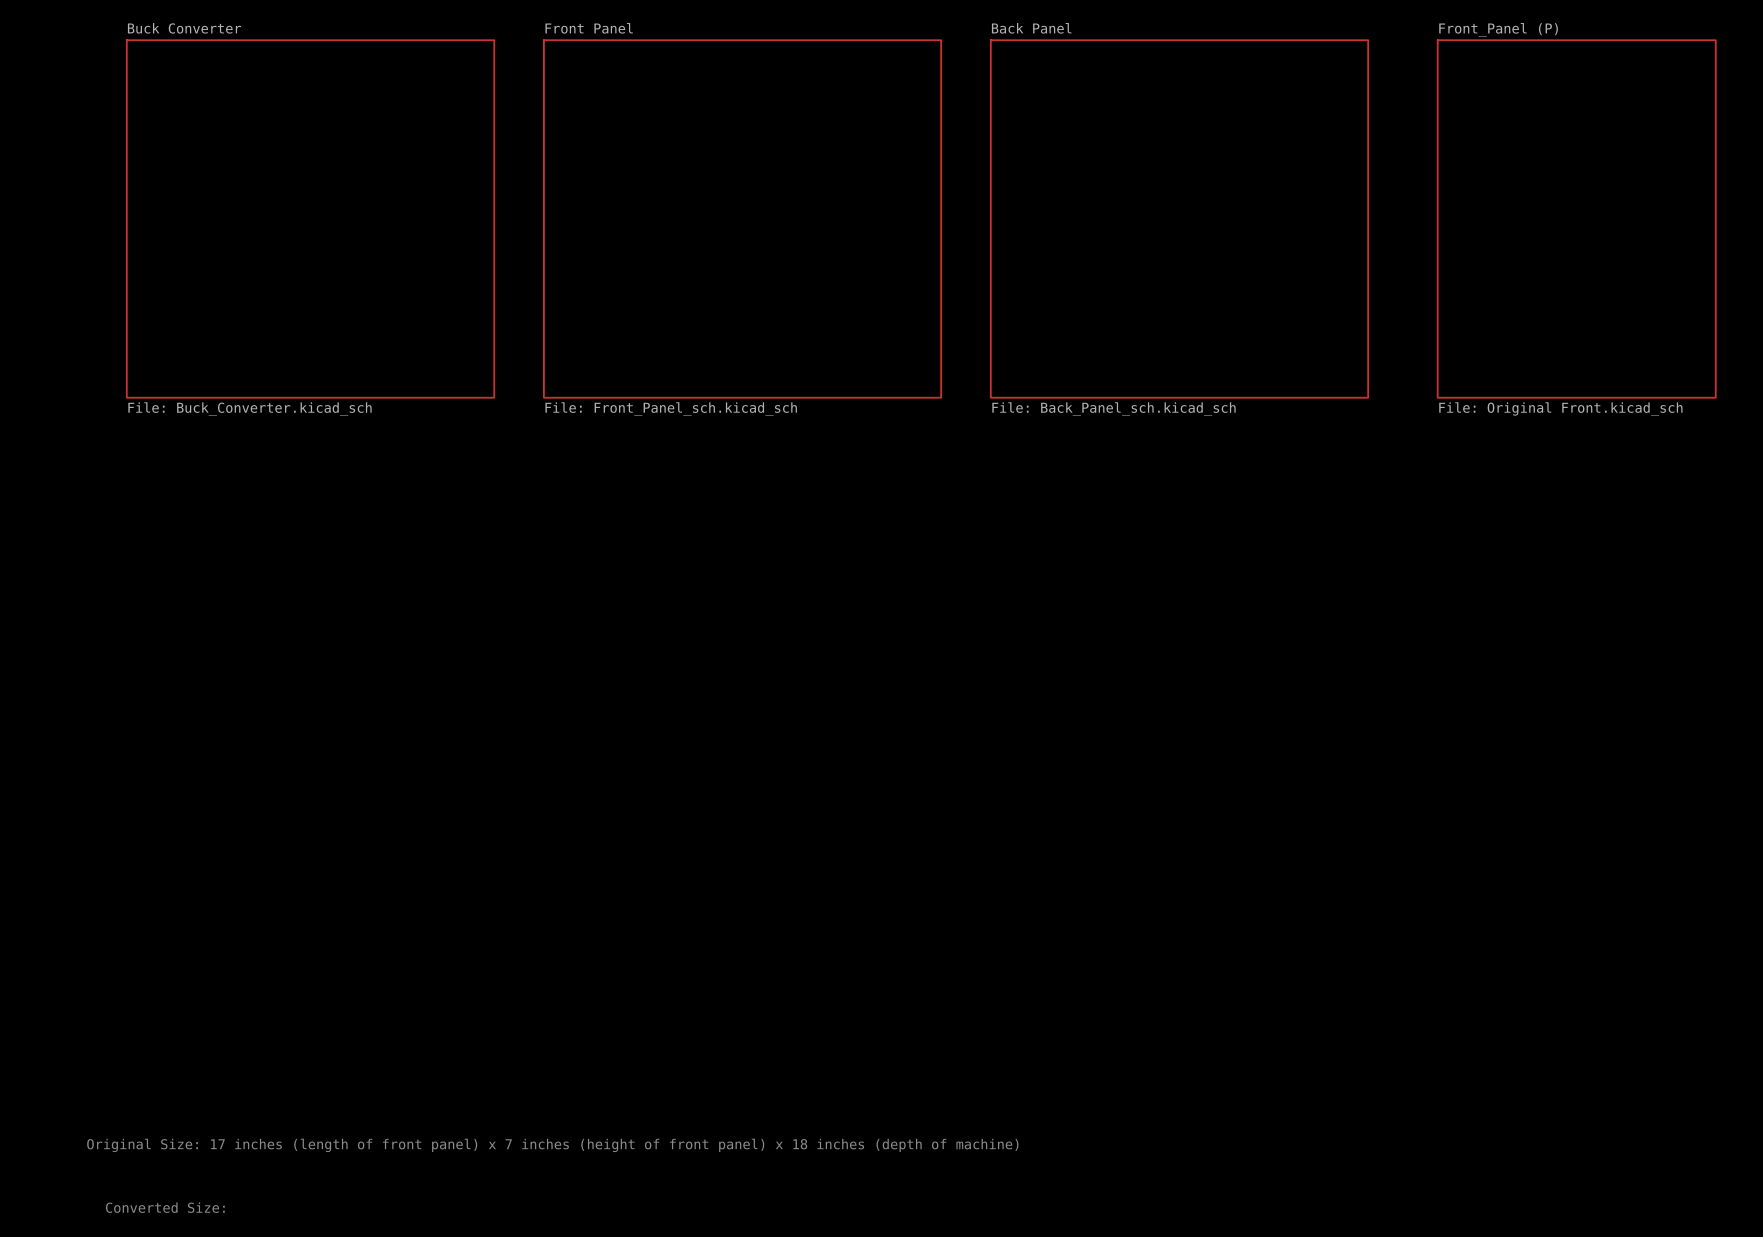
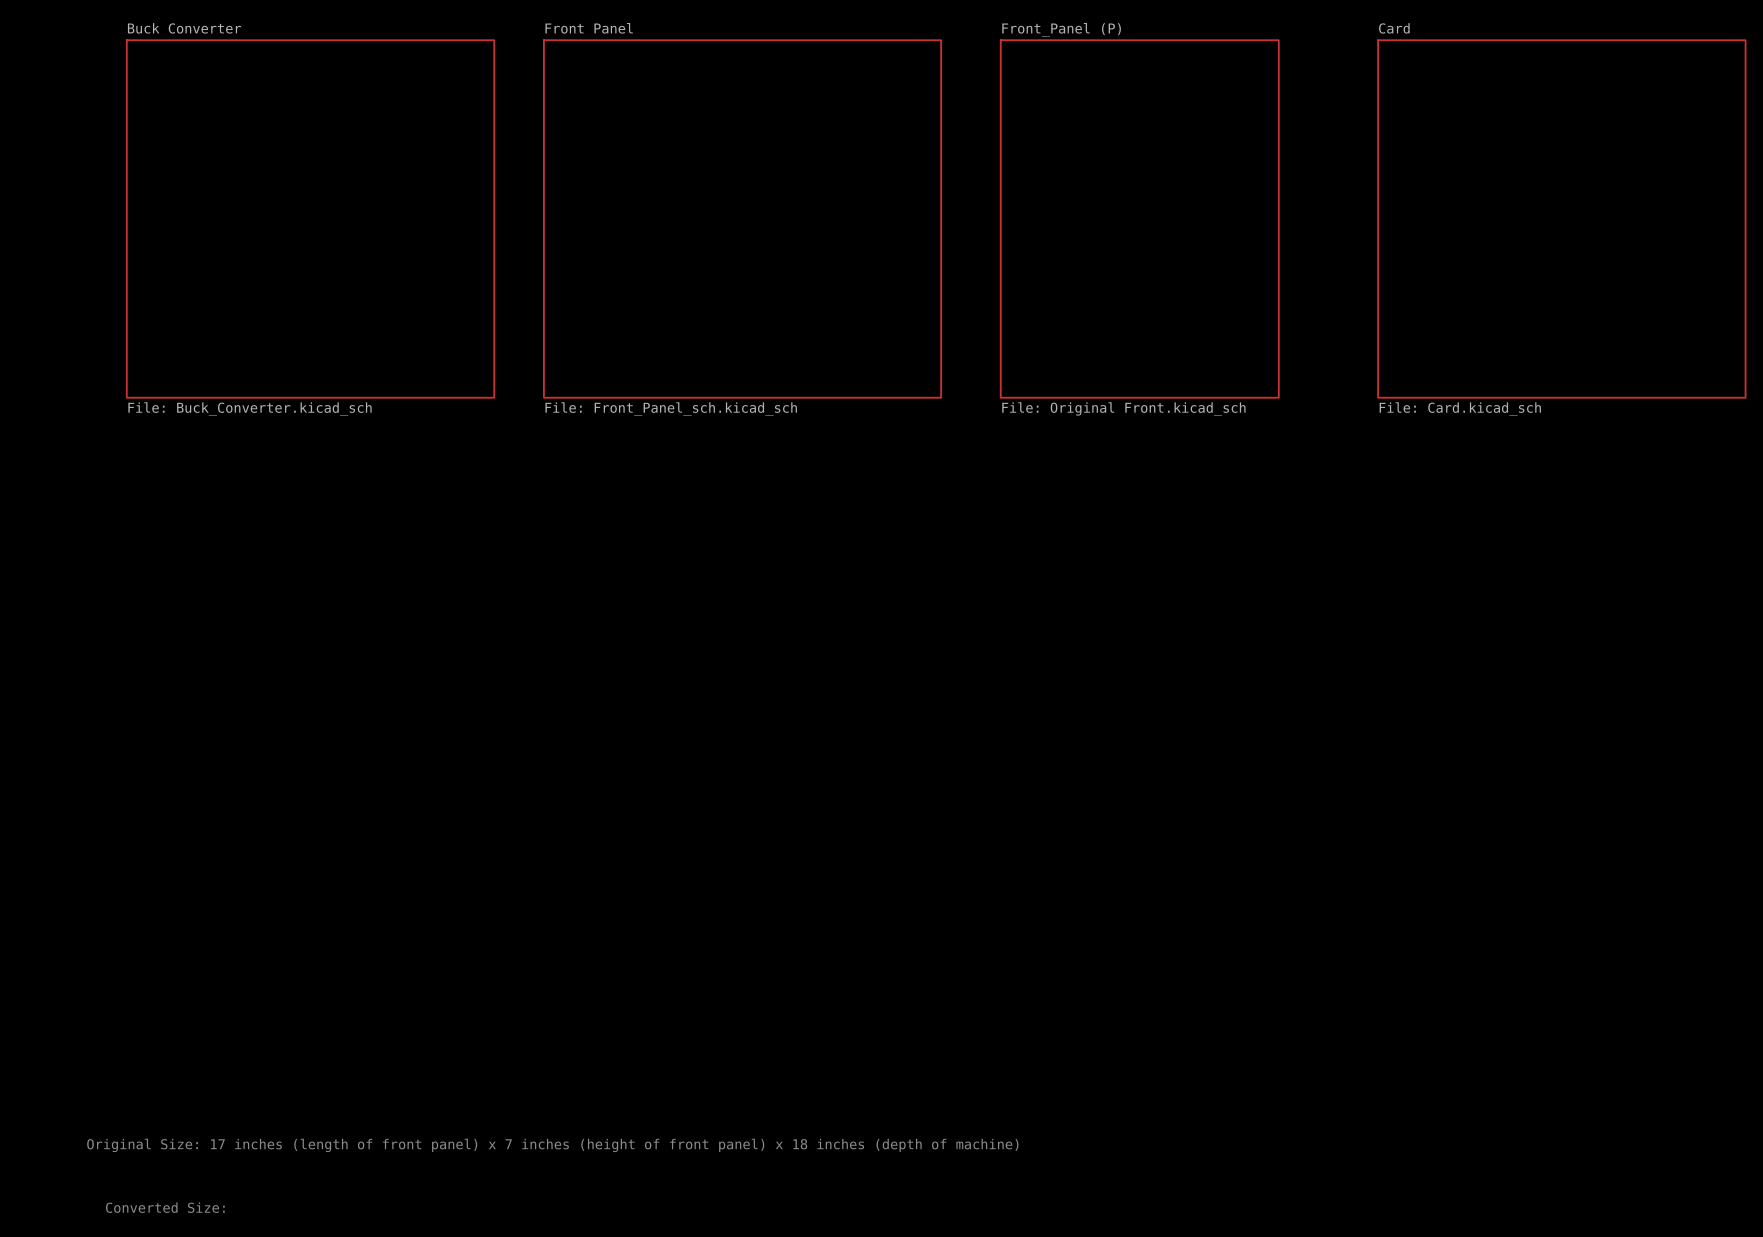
sheet Front_Panel (P): none -> File: Original Front.kicad_sch (1139, 218)
sheet Back Panel: File: Back_Panel_sch.kicad_sch (1179, 218) -> none
sheet Card: none -> File: Card.kicad_sch (1561, 218)
sheet Front_Panel (P): File: Original Front.kicad_sch (1576, 218) -> none

